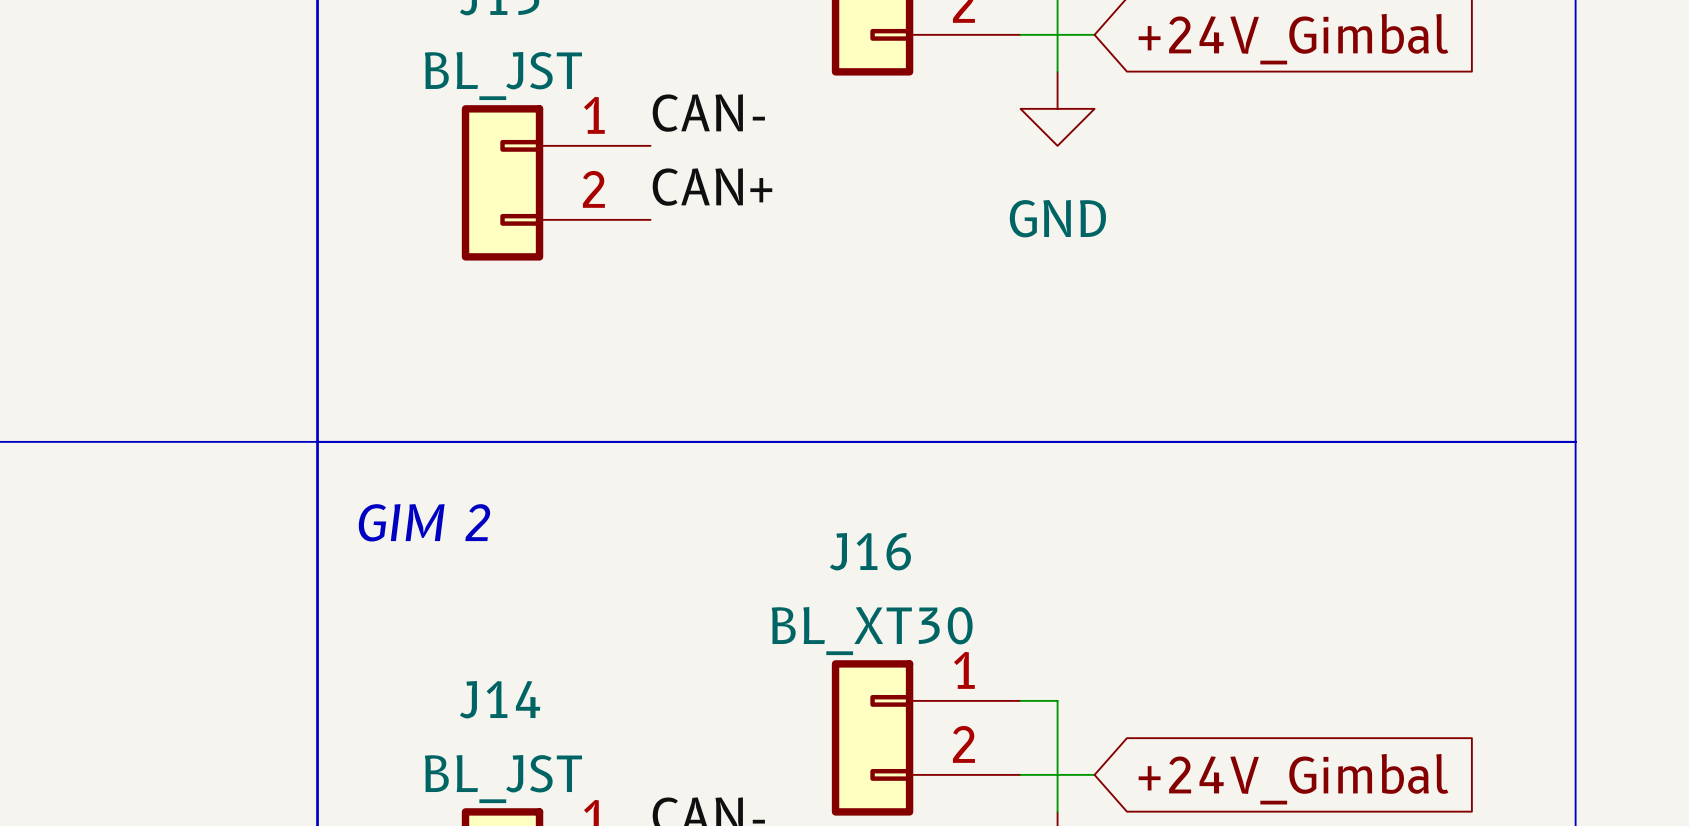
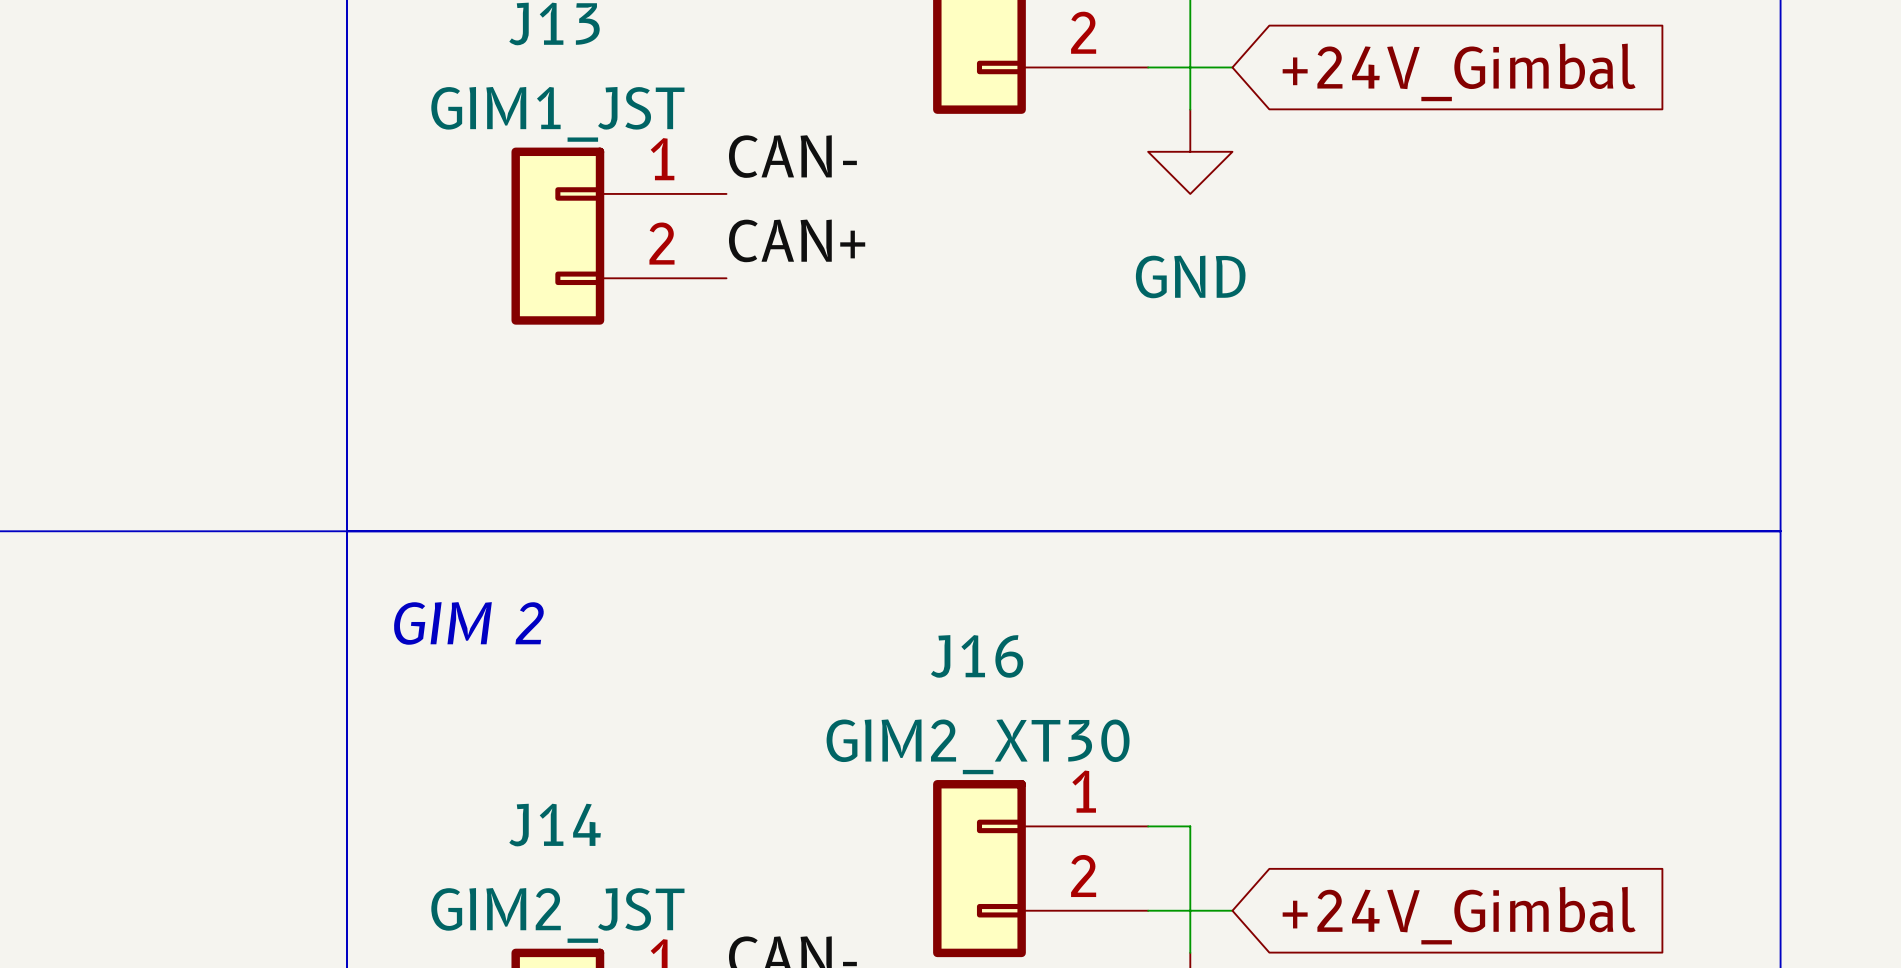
J13 value: BL_JST (503, 76) -> GIM1_JST (557, 114)
J16 value: BL_XT30 (872, 631) -> GIM2_XT30 (978, 746)
J14 value: BL_JST (503, 779) -> GIM2_JST (557, 915)

